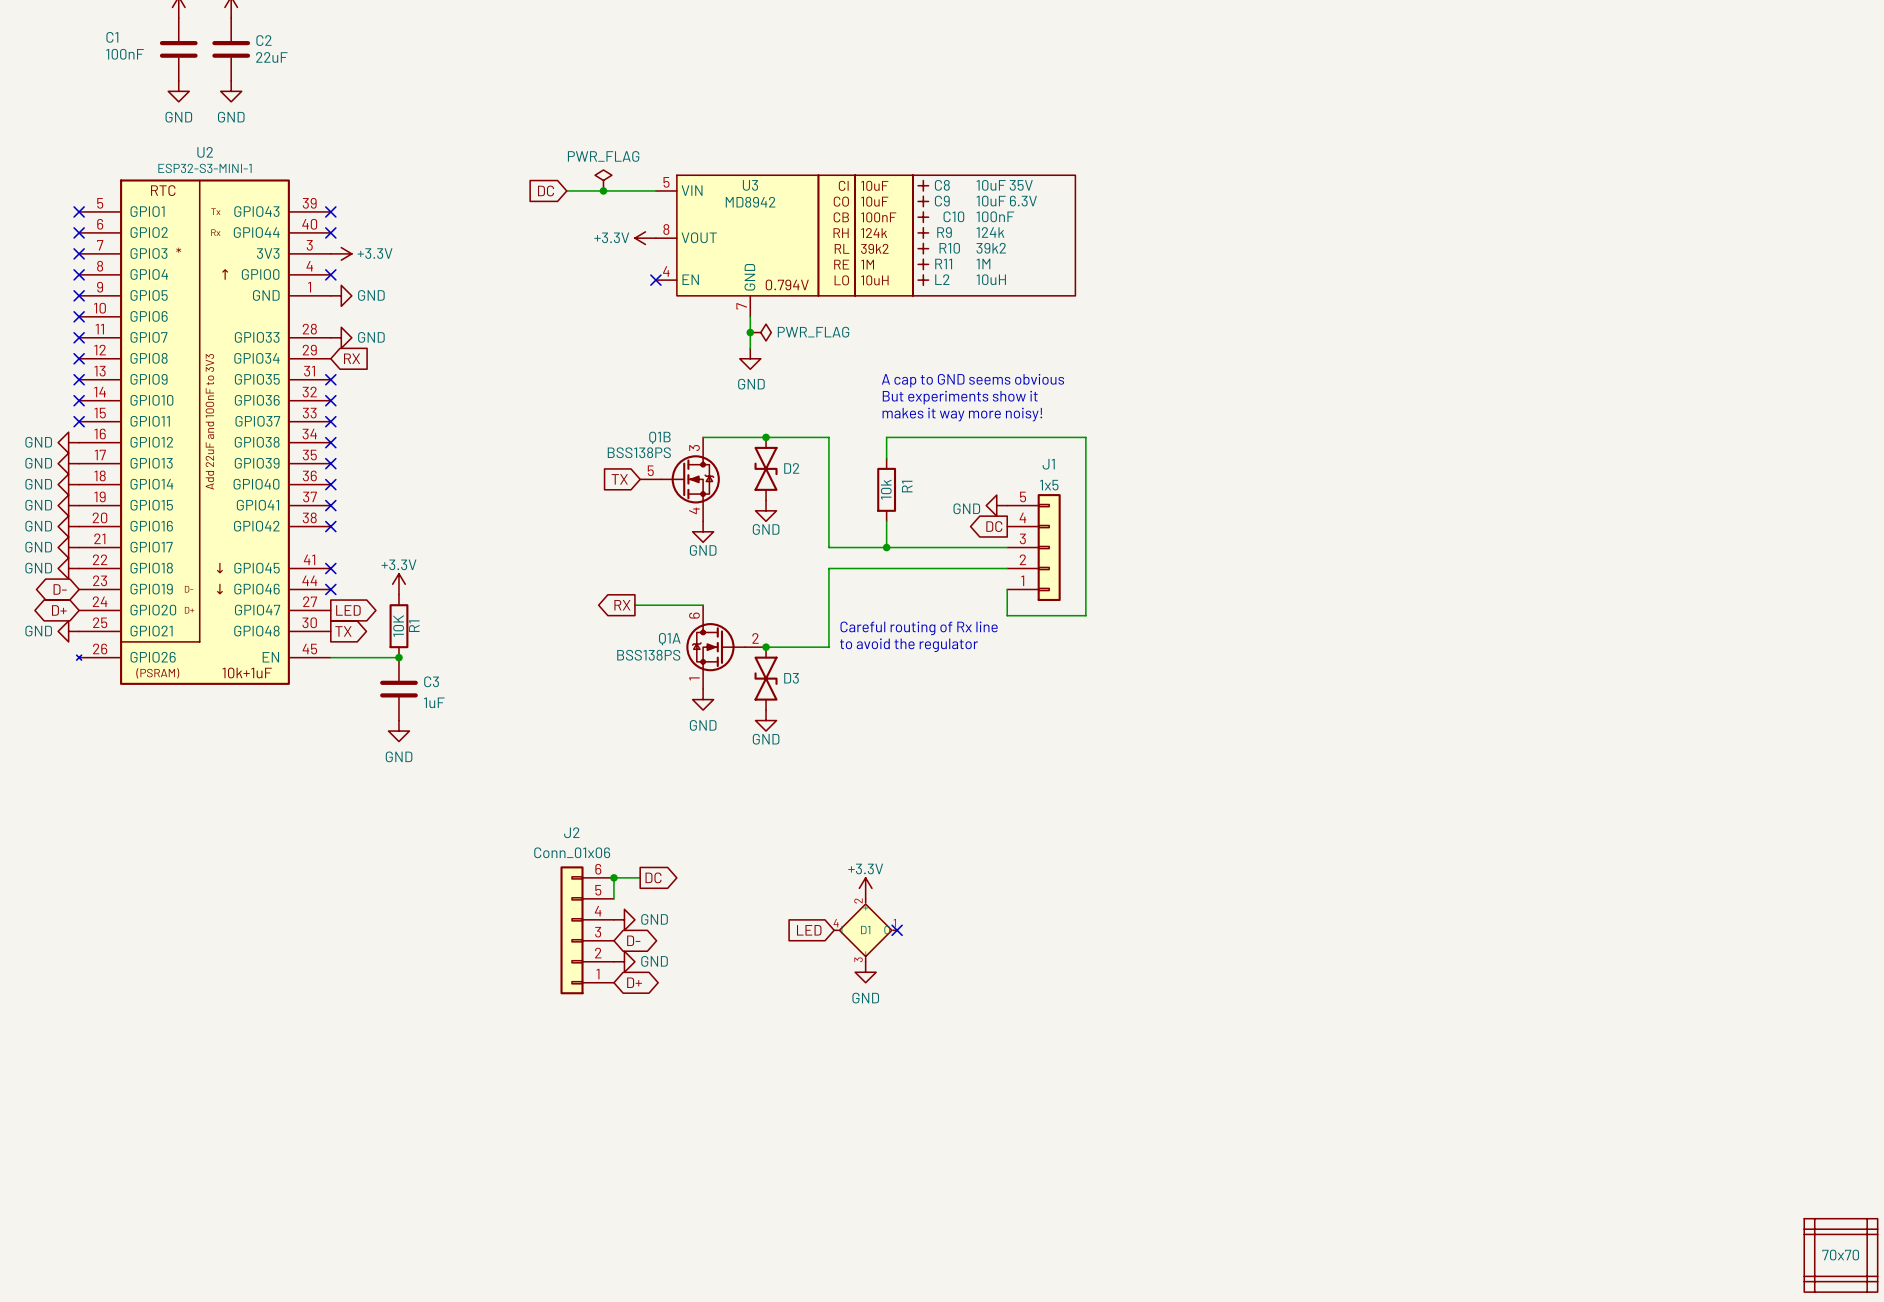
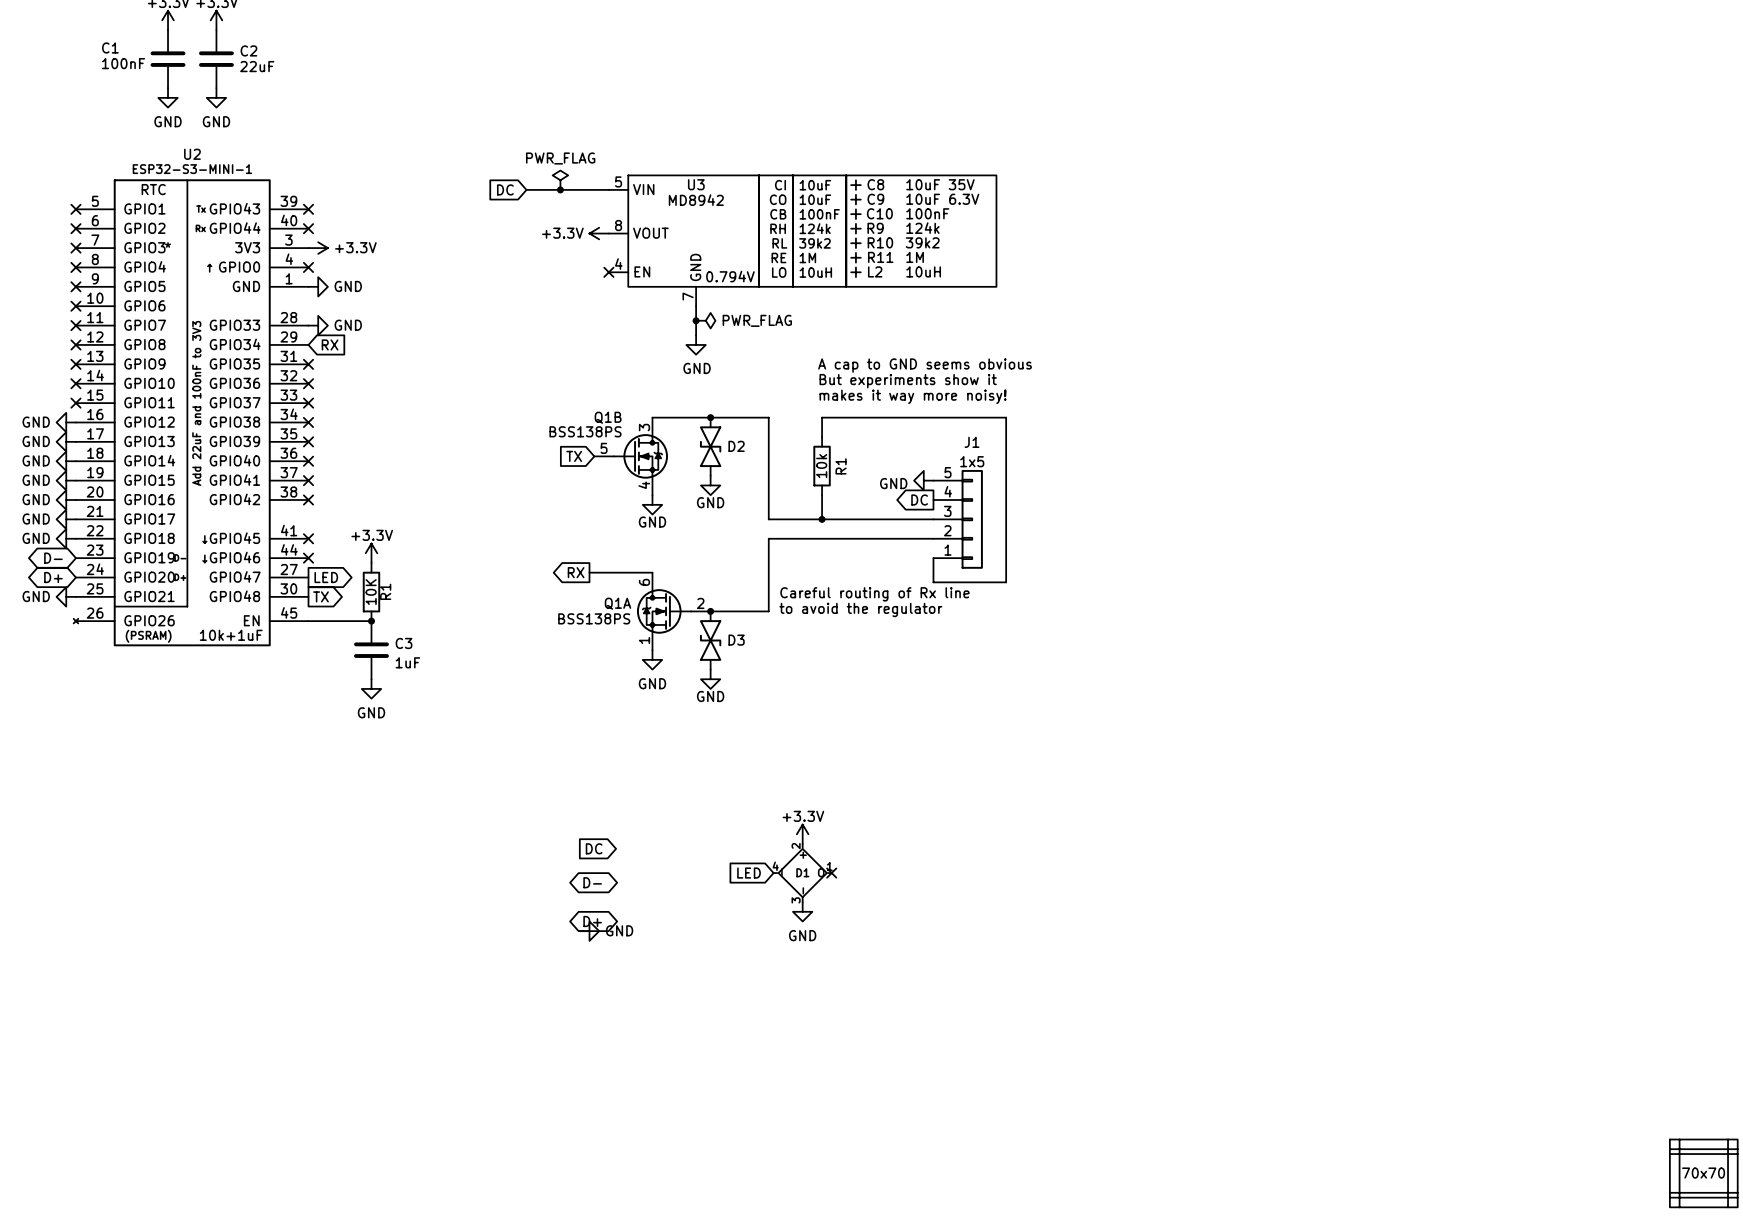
junction: (613, 877) -> none
wire: (640, 877) (613, 877) (613, 898) -> none
global label position: DC (653, 877) -> DC (594, 848)
power symbol: GND (624, 919) -> none
J2: Conn_01x06 (587, 930) -> none
power symbol position: GND (624, 961) -> GND (589, 931)

